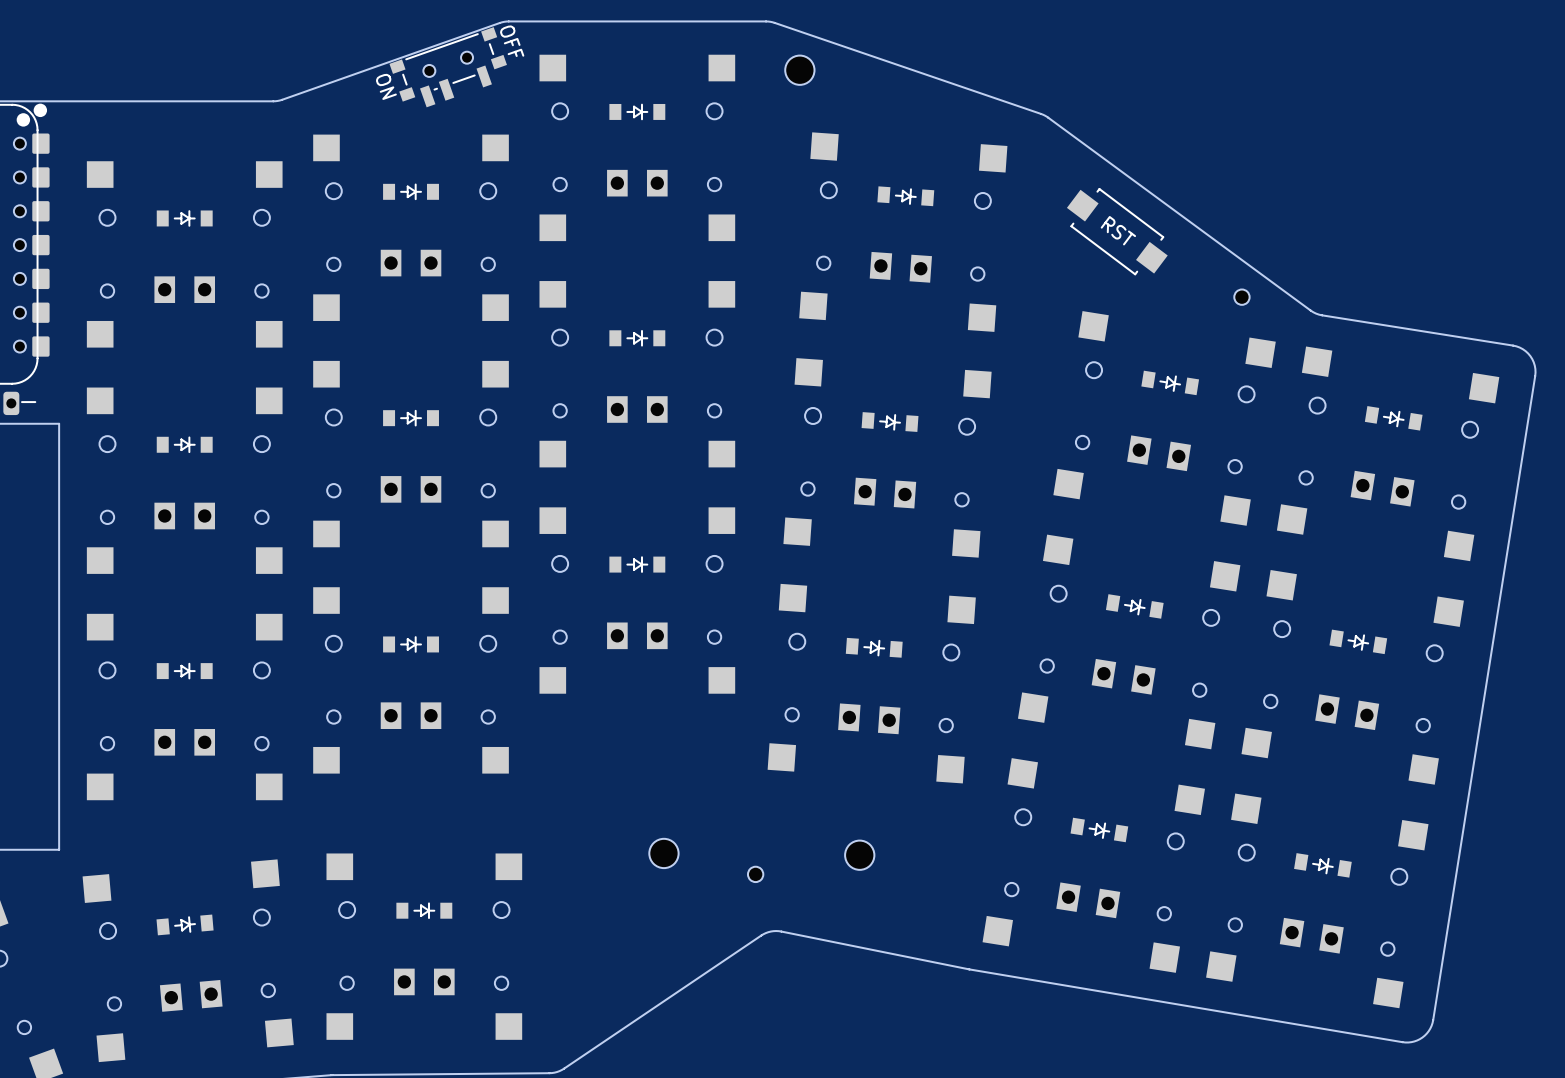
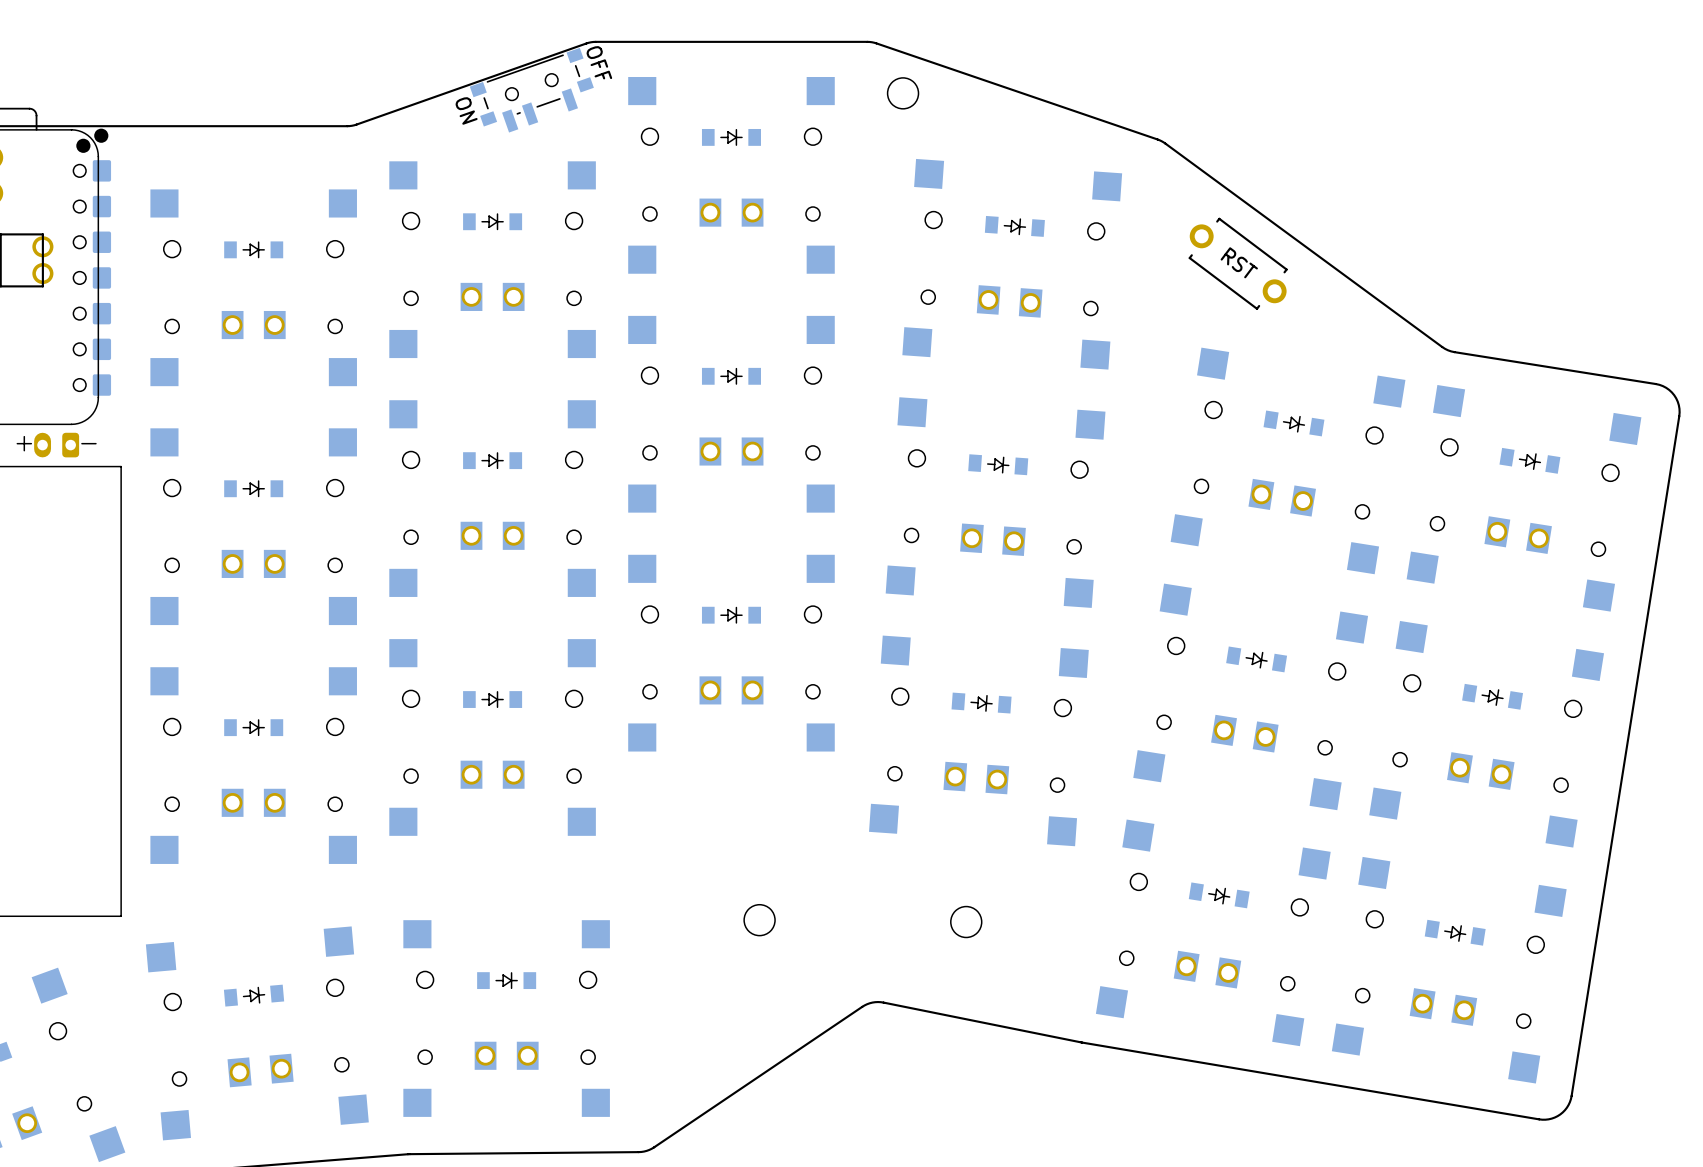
part footprint: [1066, 188, 1168, 276] -> [1188, 217, 1288, 310]
part: (1241, 297) -> none
part: (755, 874) -> none

